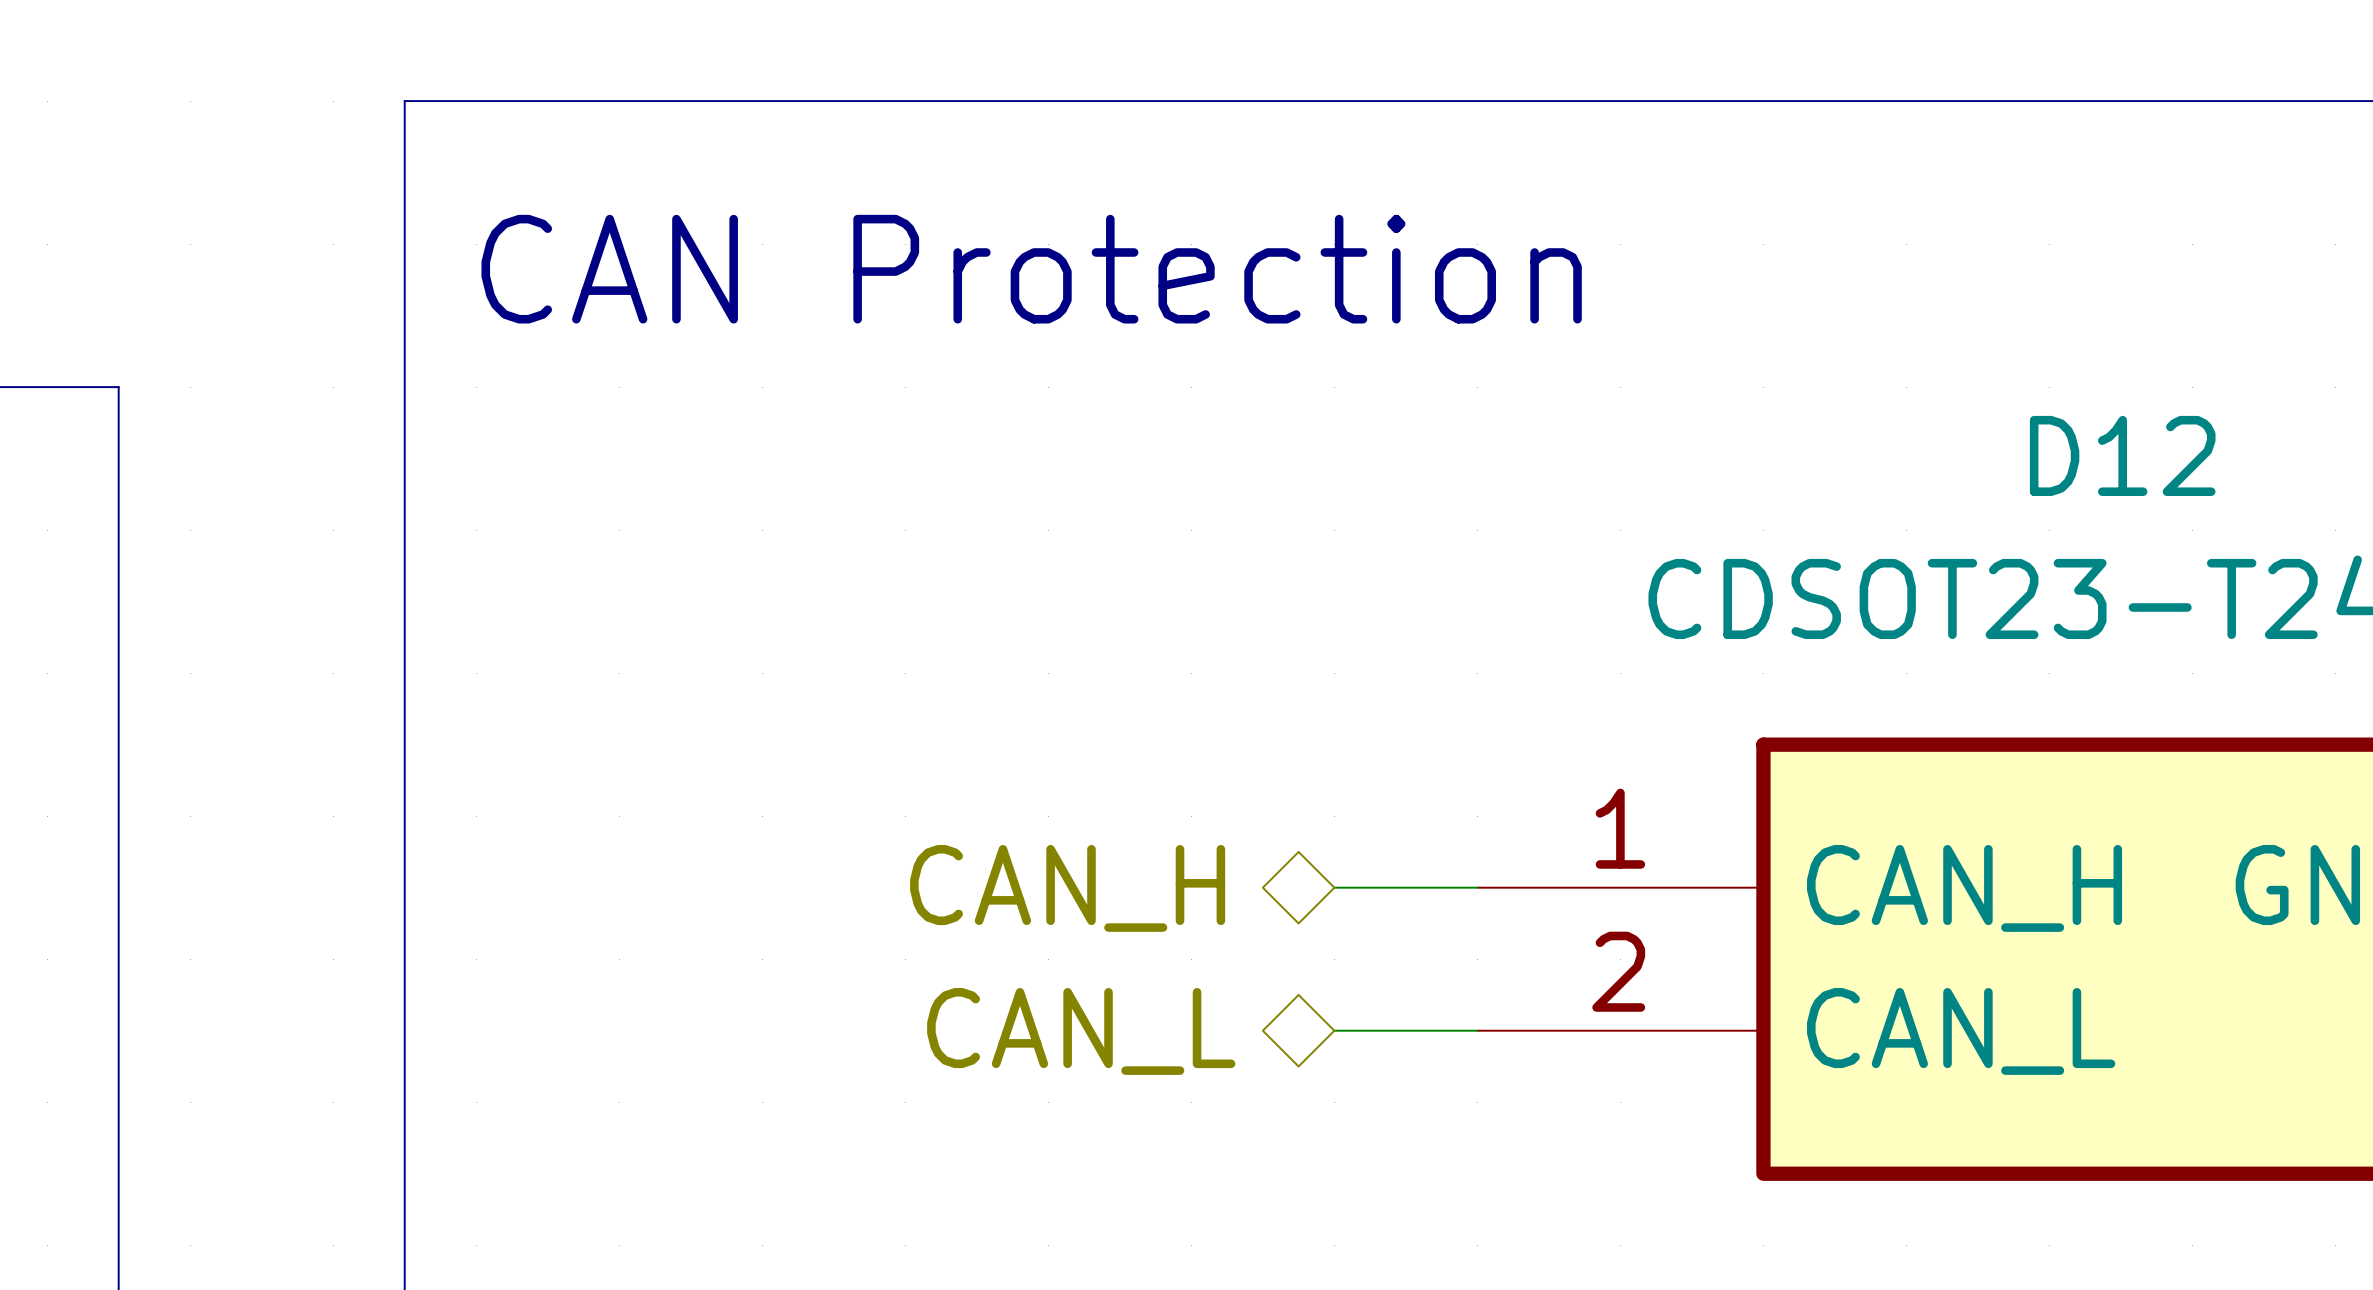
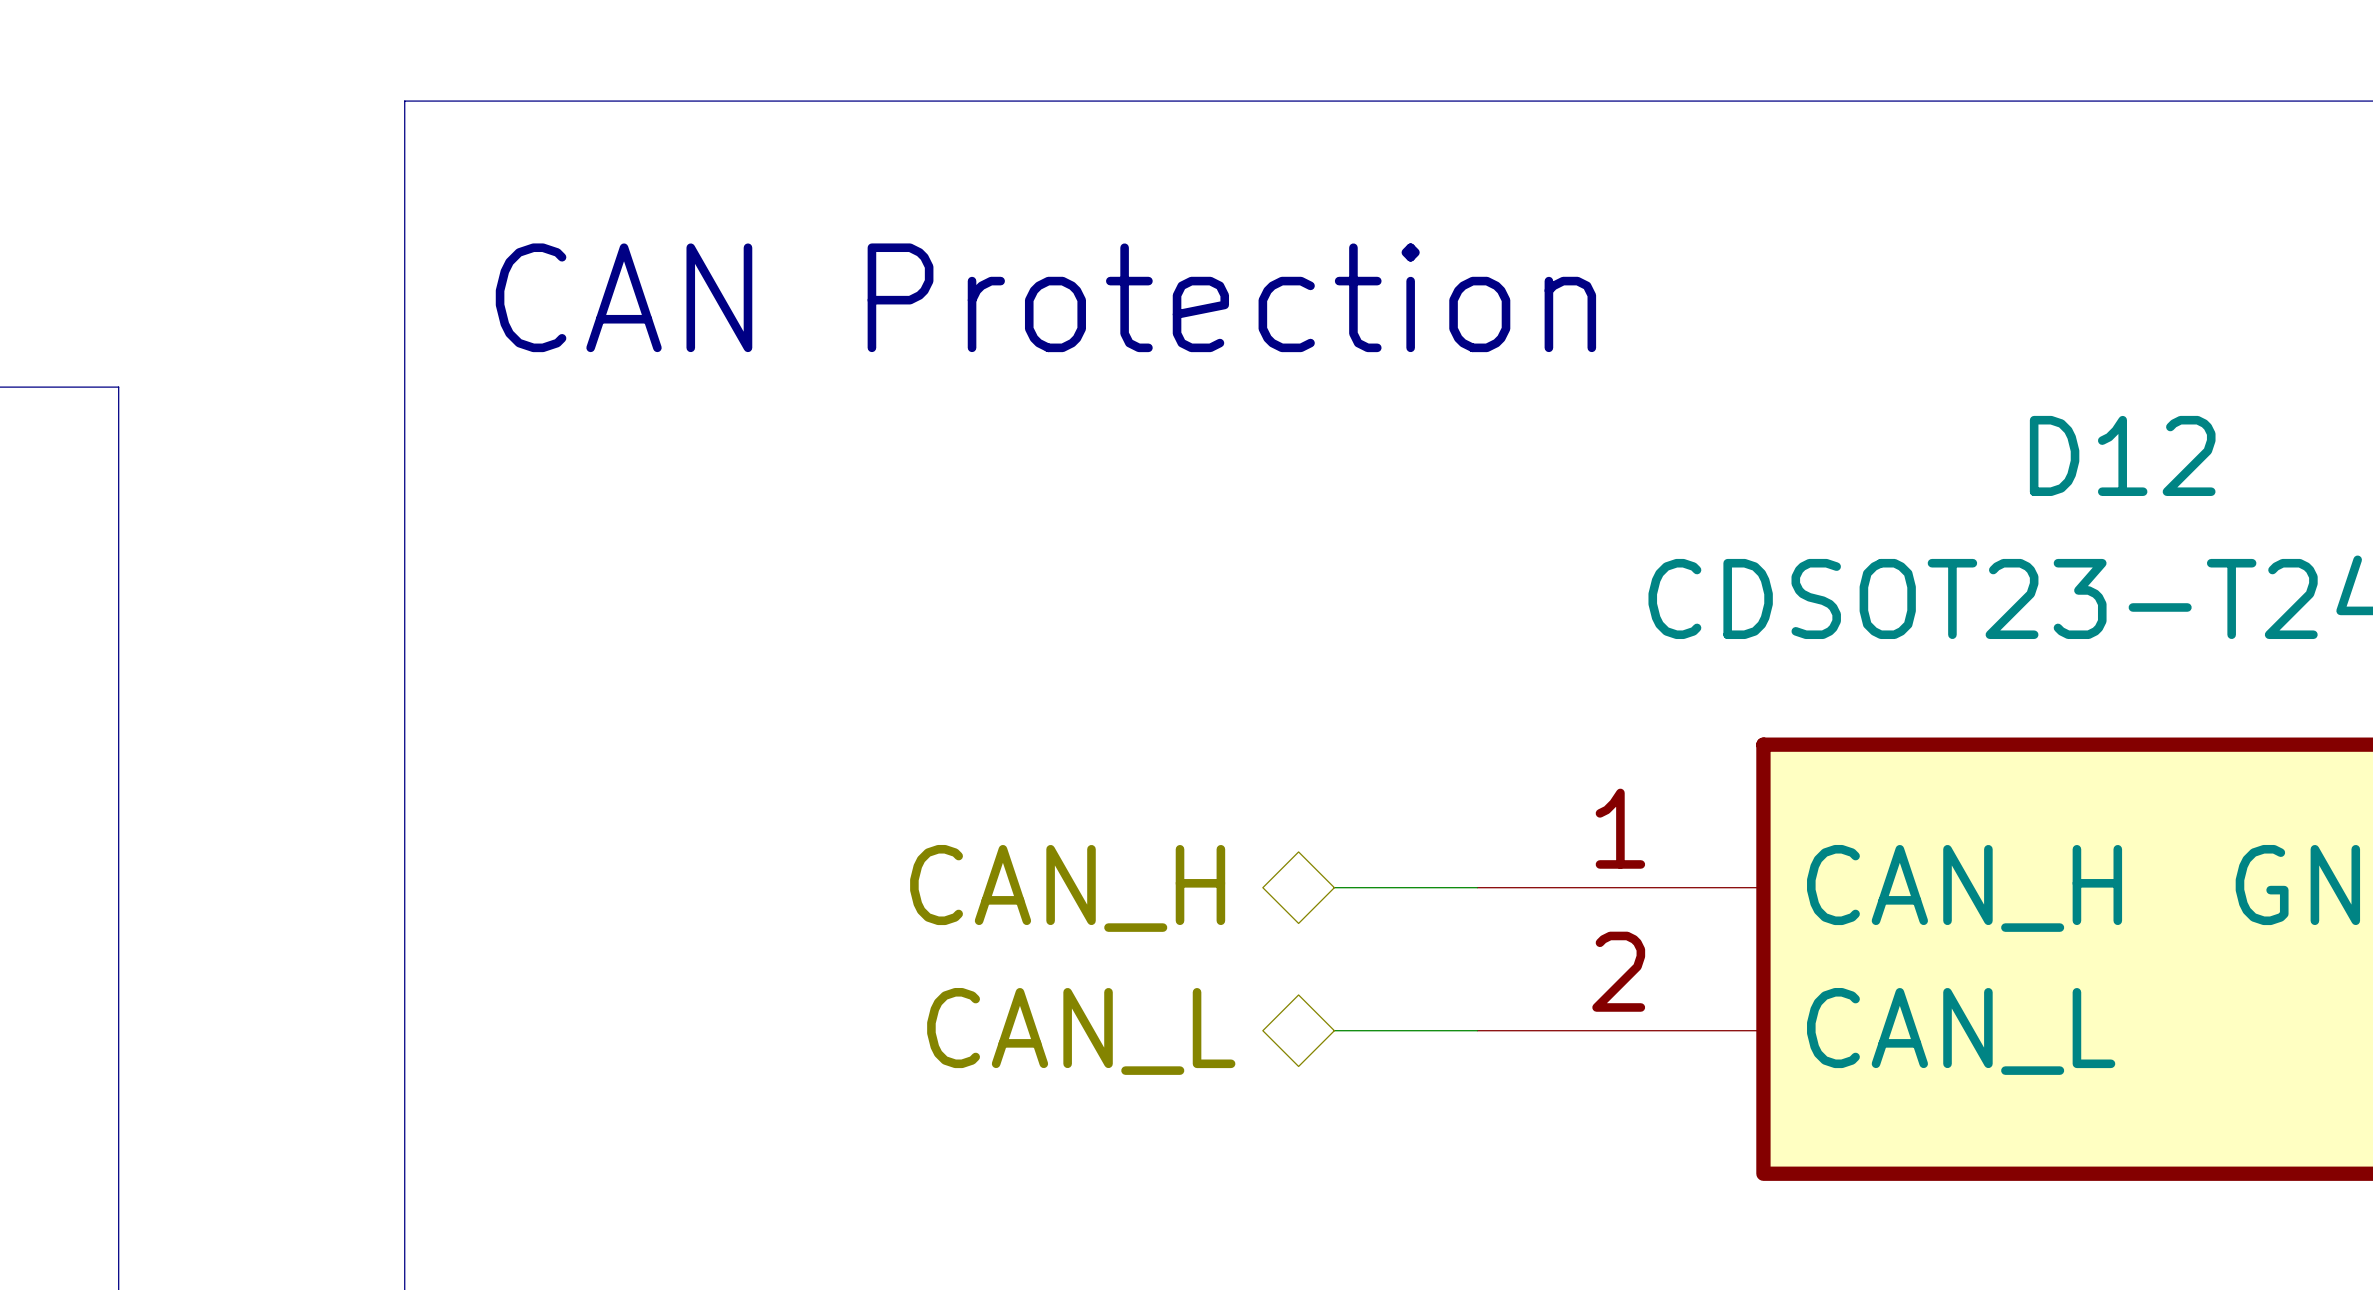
text position: CAN Protection (1031, 269) -> CAN Protection (1045, 297)

